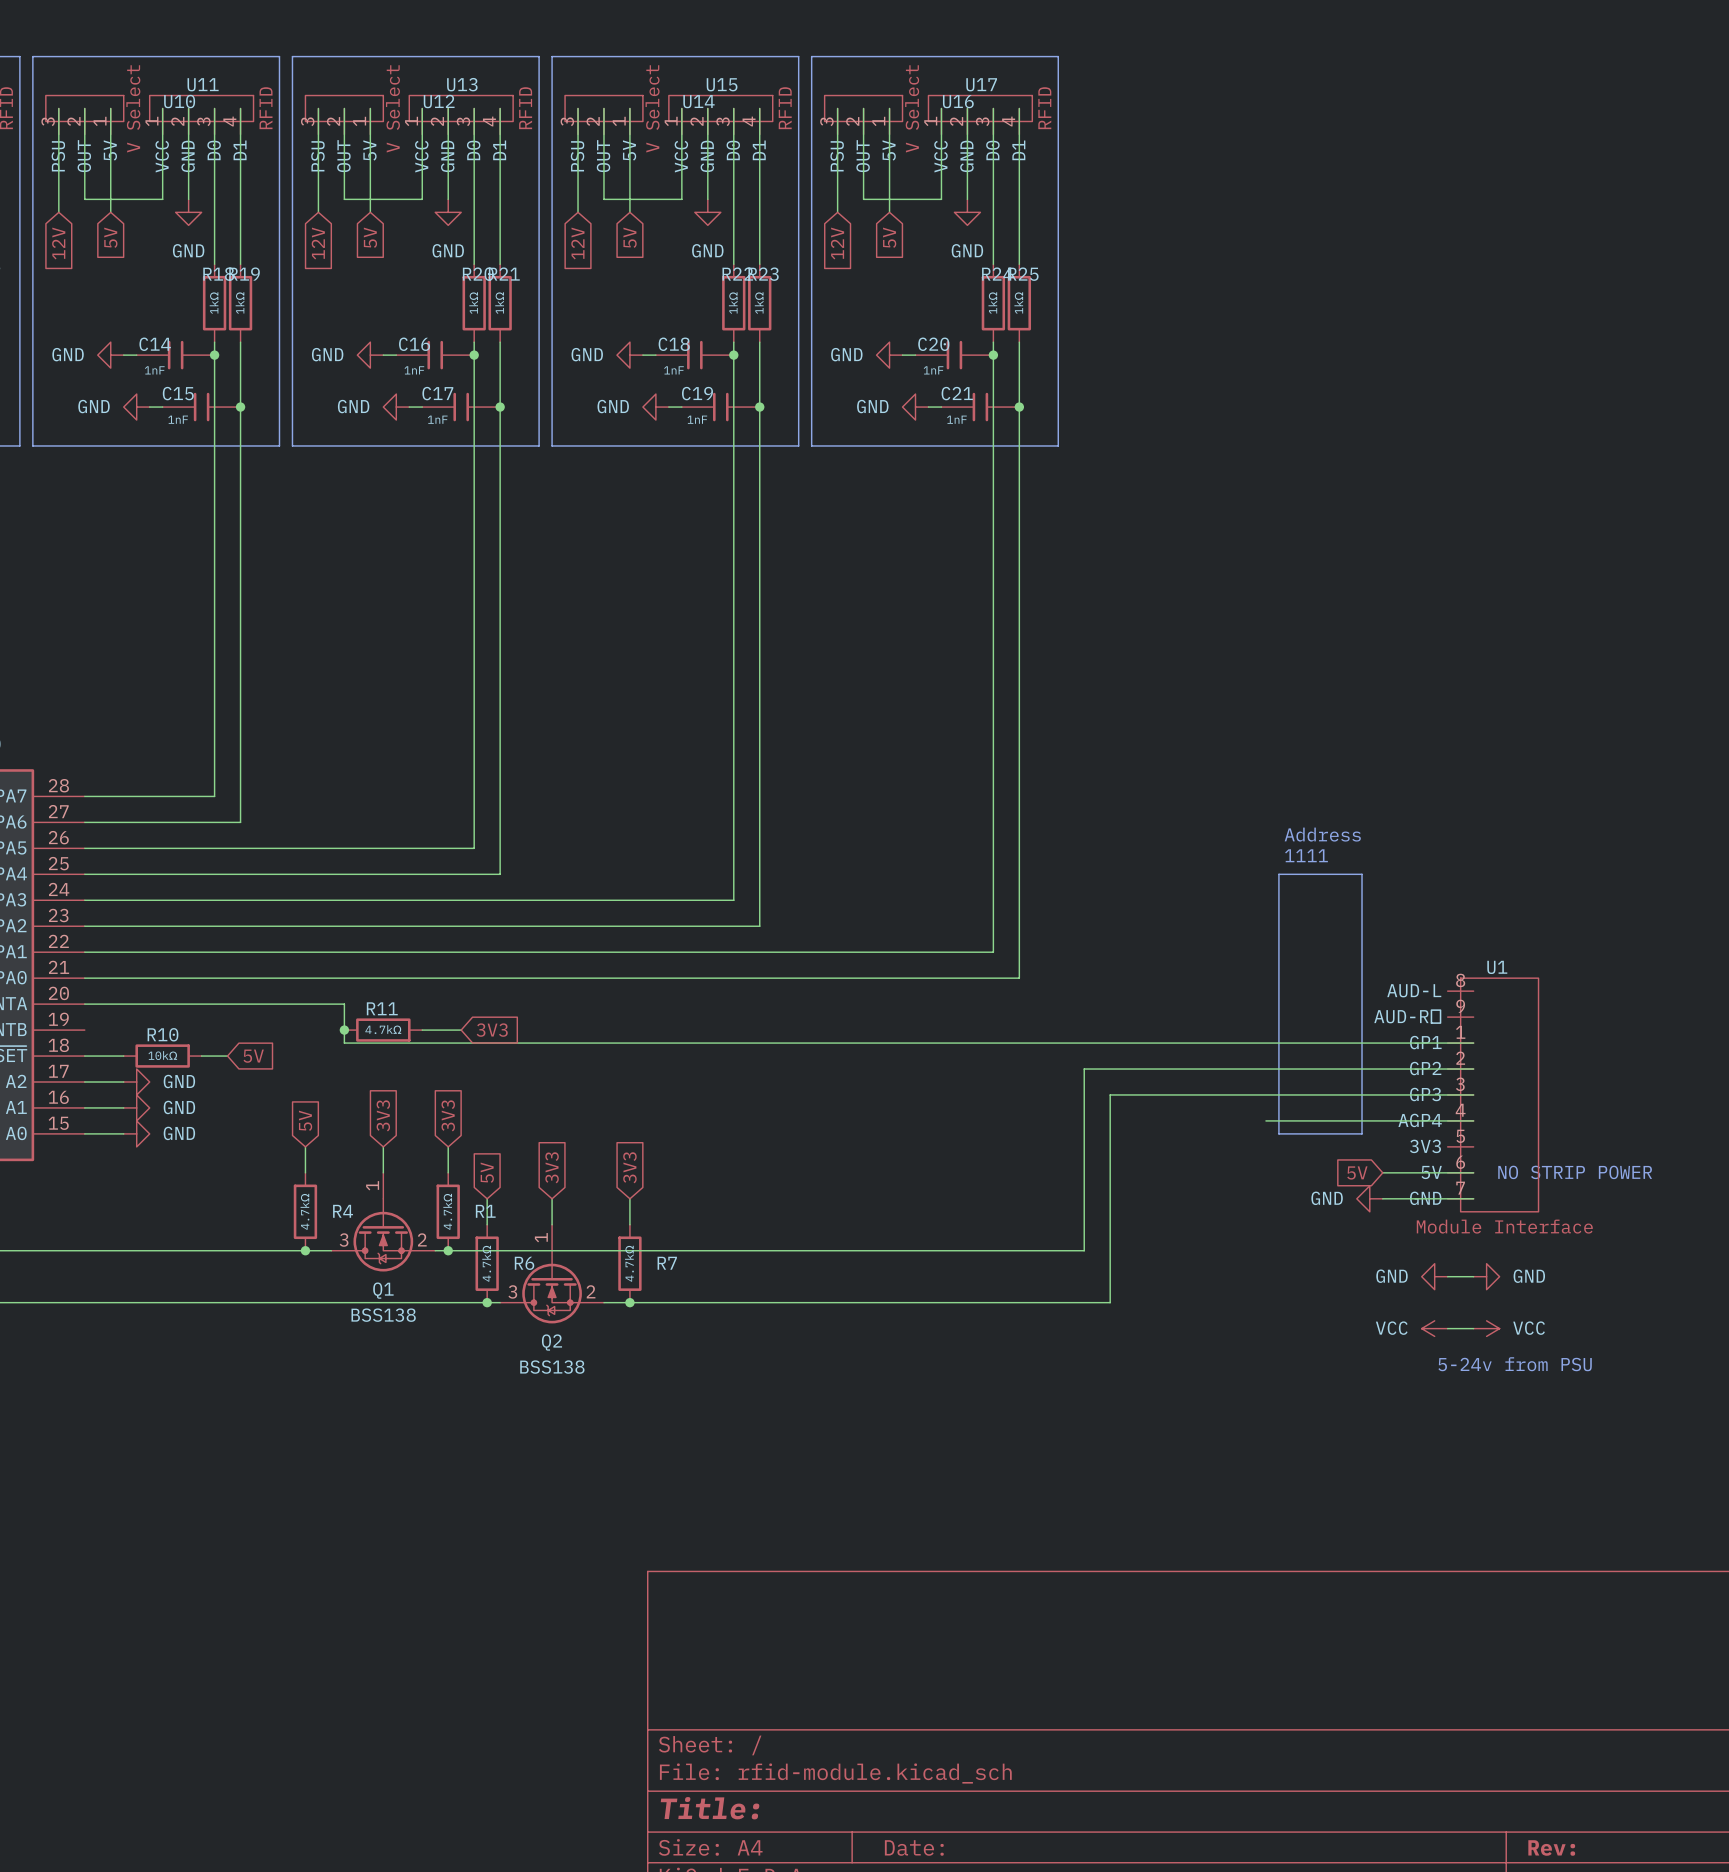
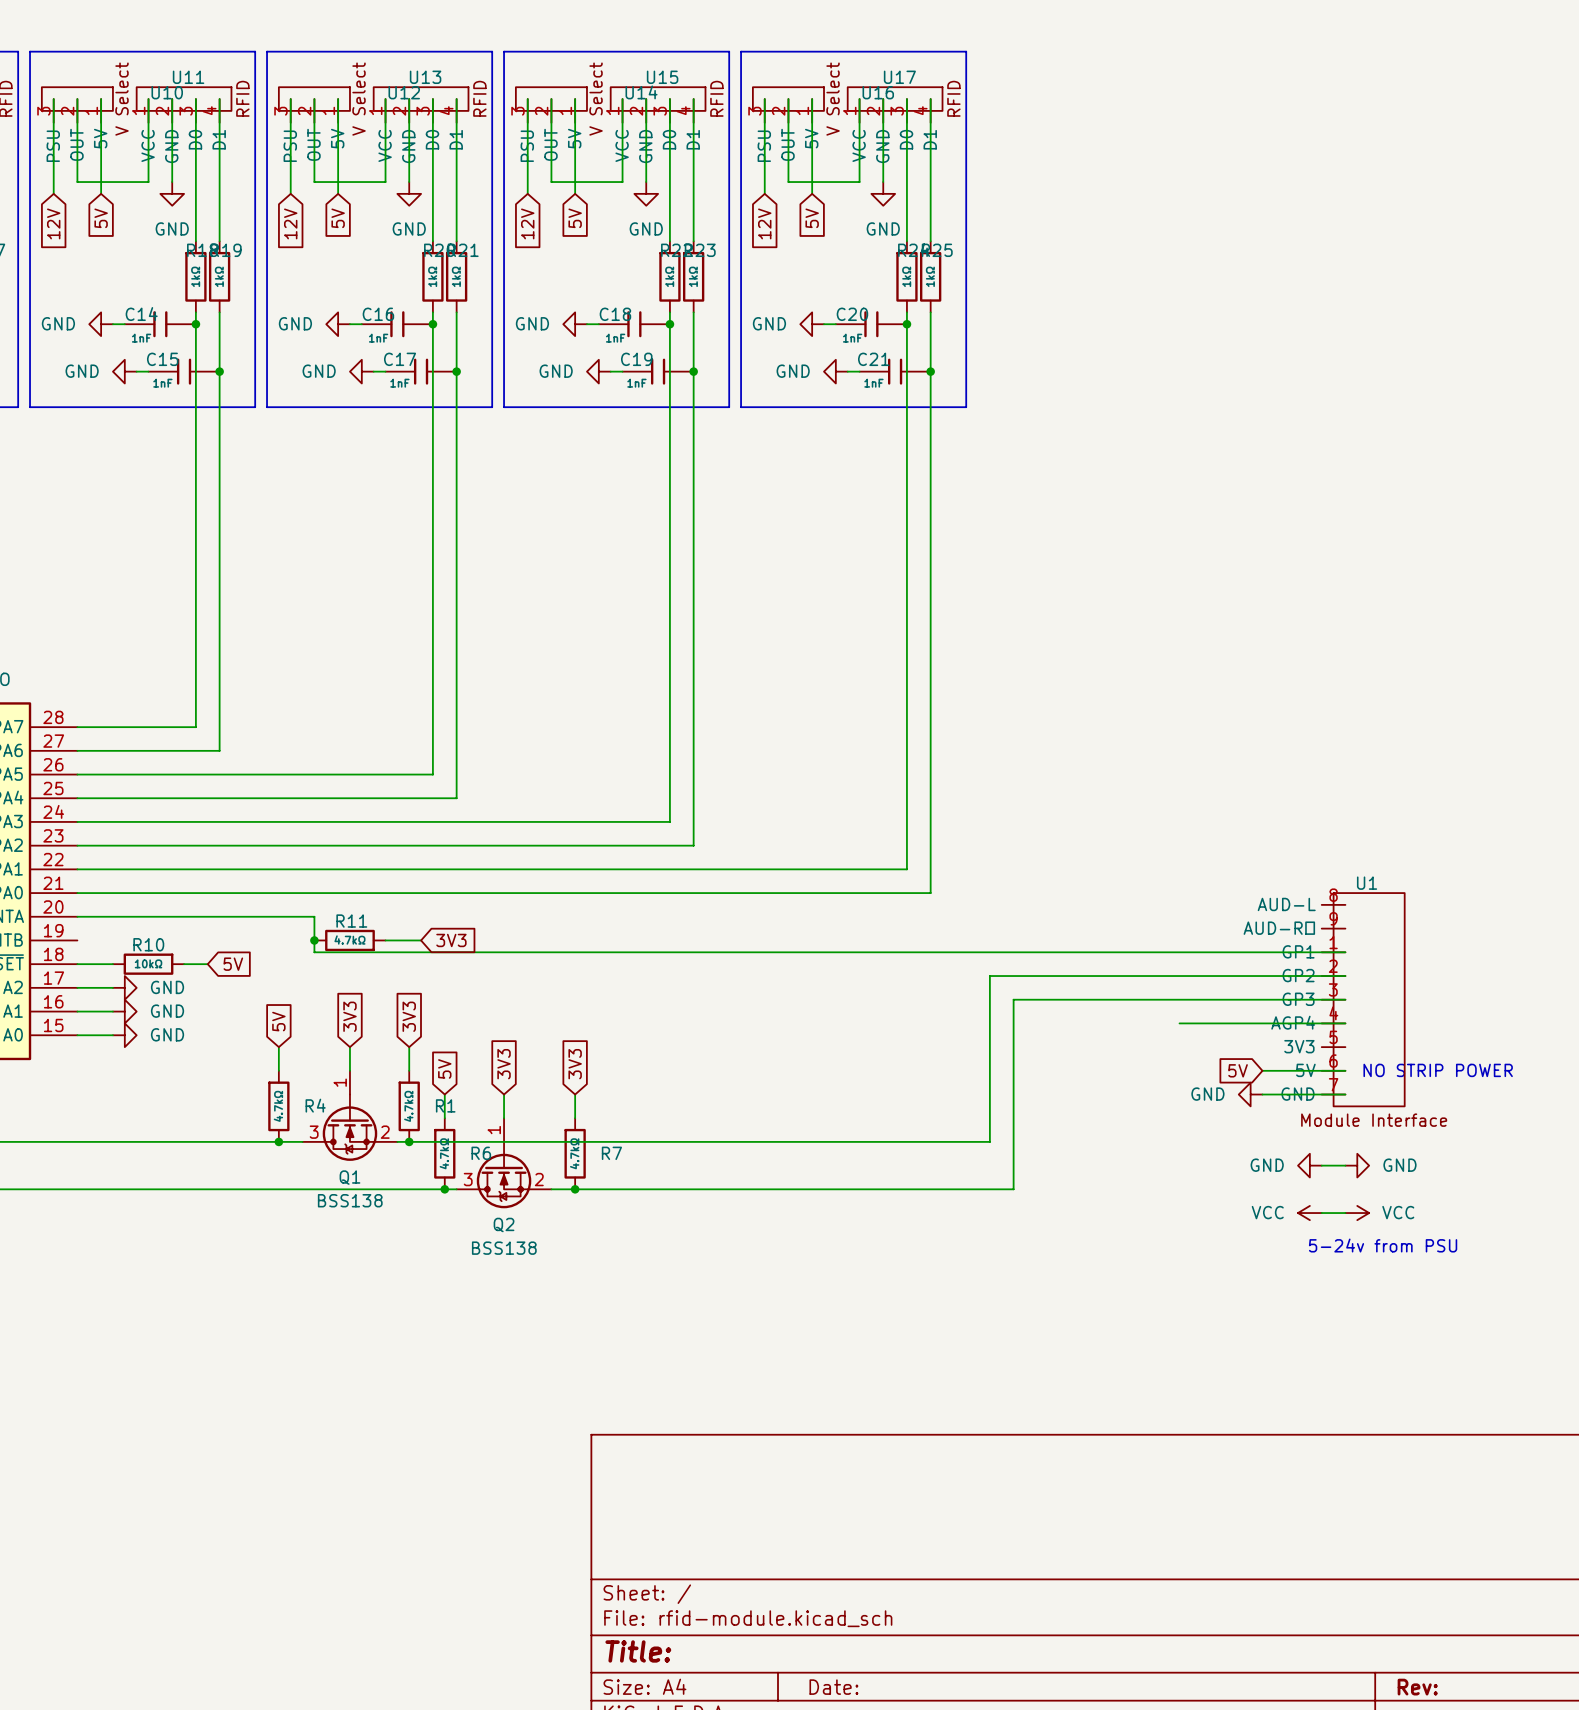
text: Address (1322, 834) -> none
text: 1111 (1306, 855) -> none
line: (1278, 874) (1362, 874) (1362, 1133) (1278, 1133) (1278, 874) -> none
wire: (1265, 1120) (1291, 1120) -> none

